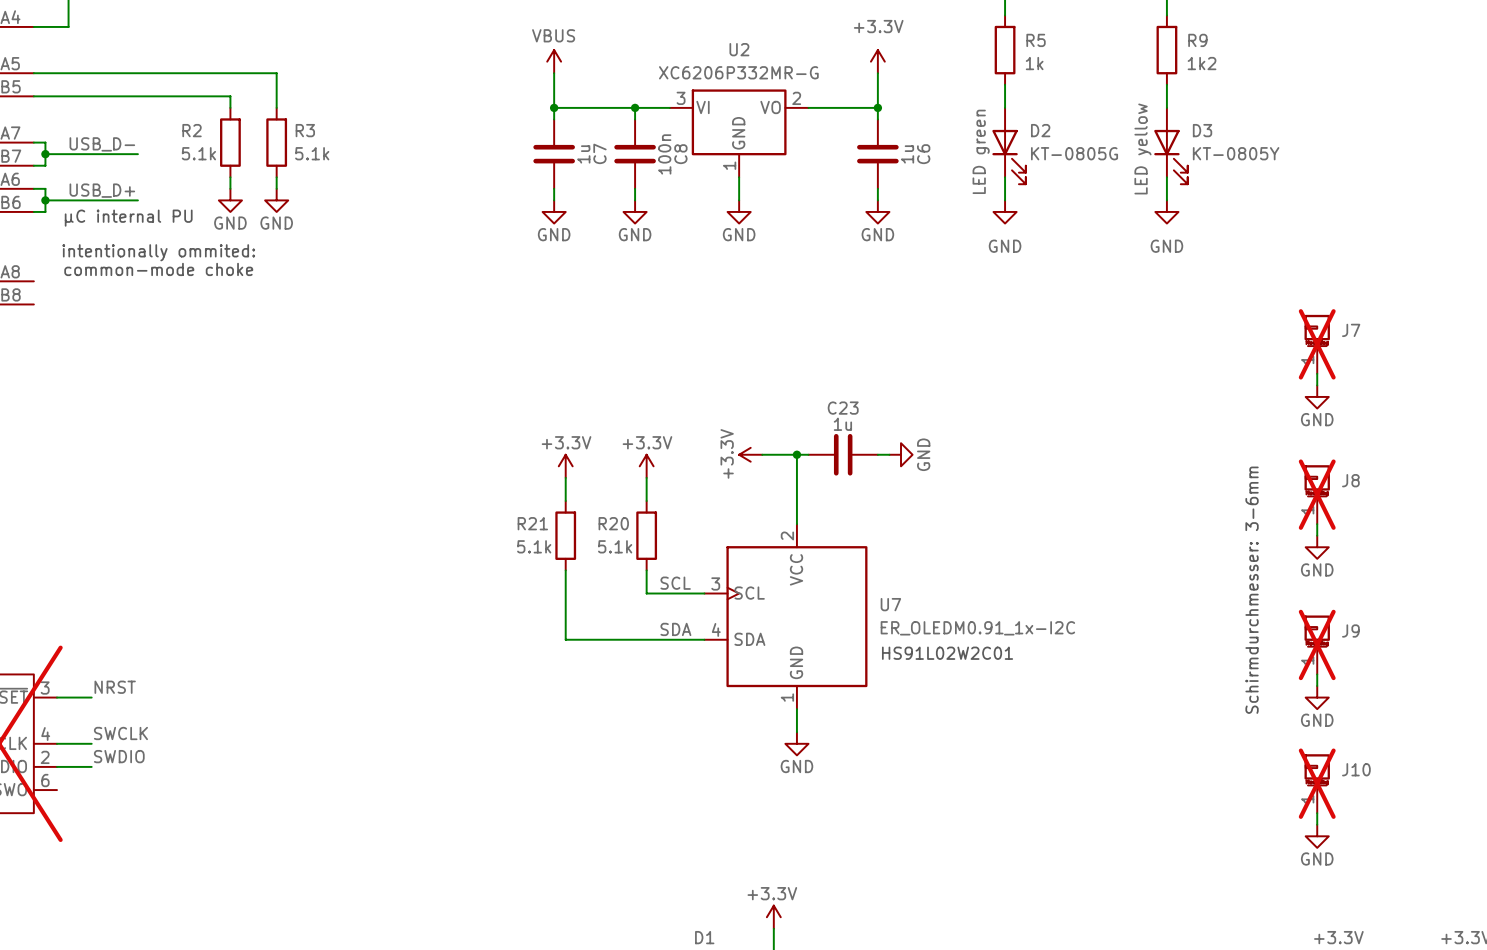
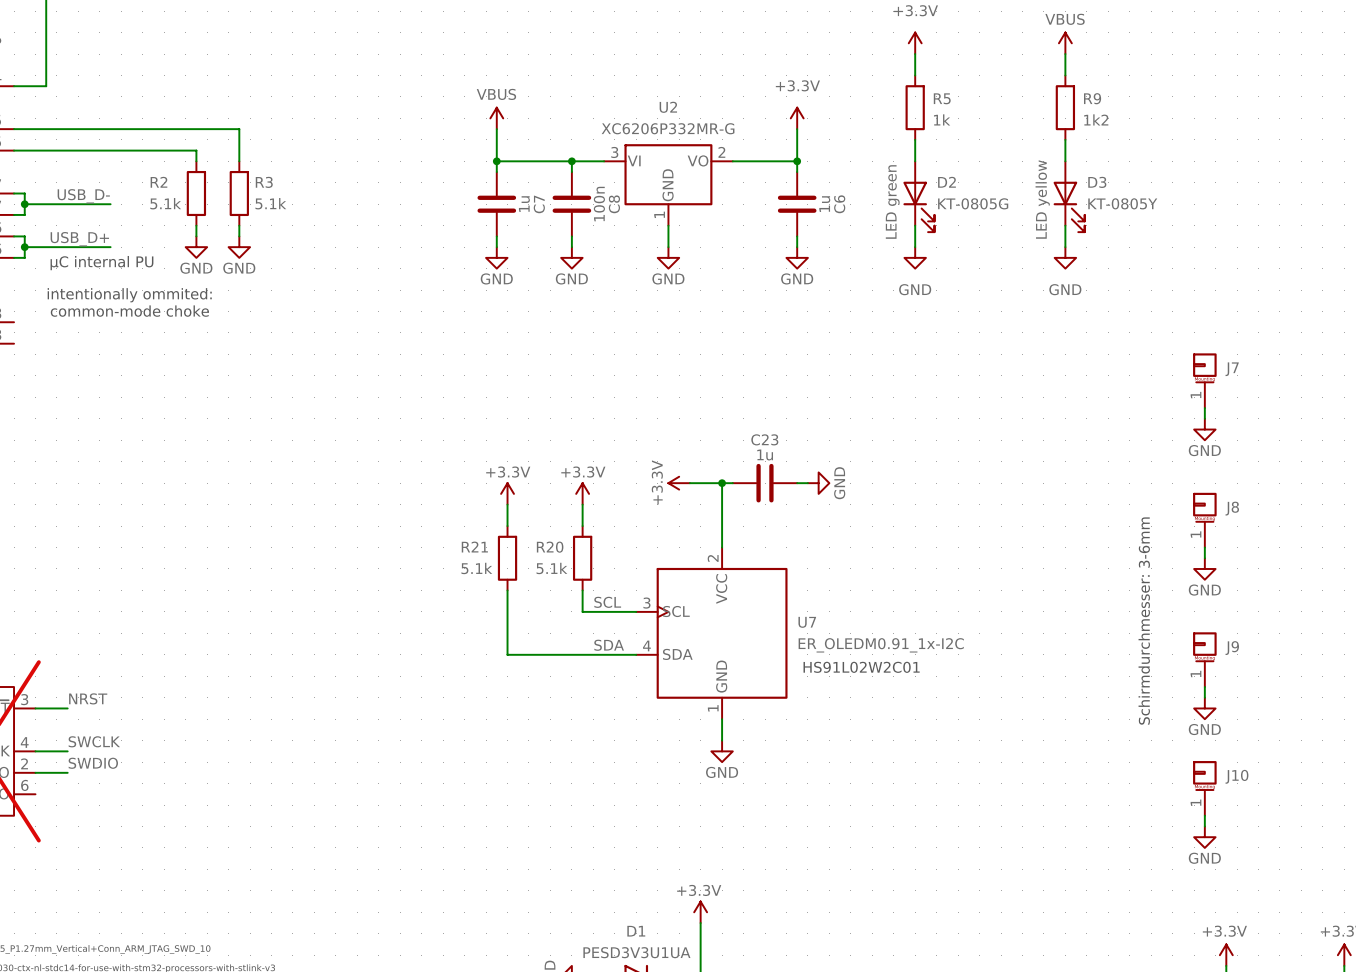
J7 do-not-place cross: (1317, 344) -> none
J8 do-not-place cross: (1317, 494) -> none
J9 do-not-place cross: (1317, 644) -> none
J10 do-not-place cross: (1317, 783) -> none

